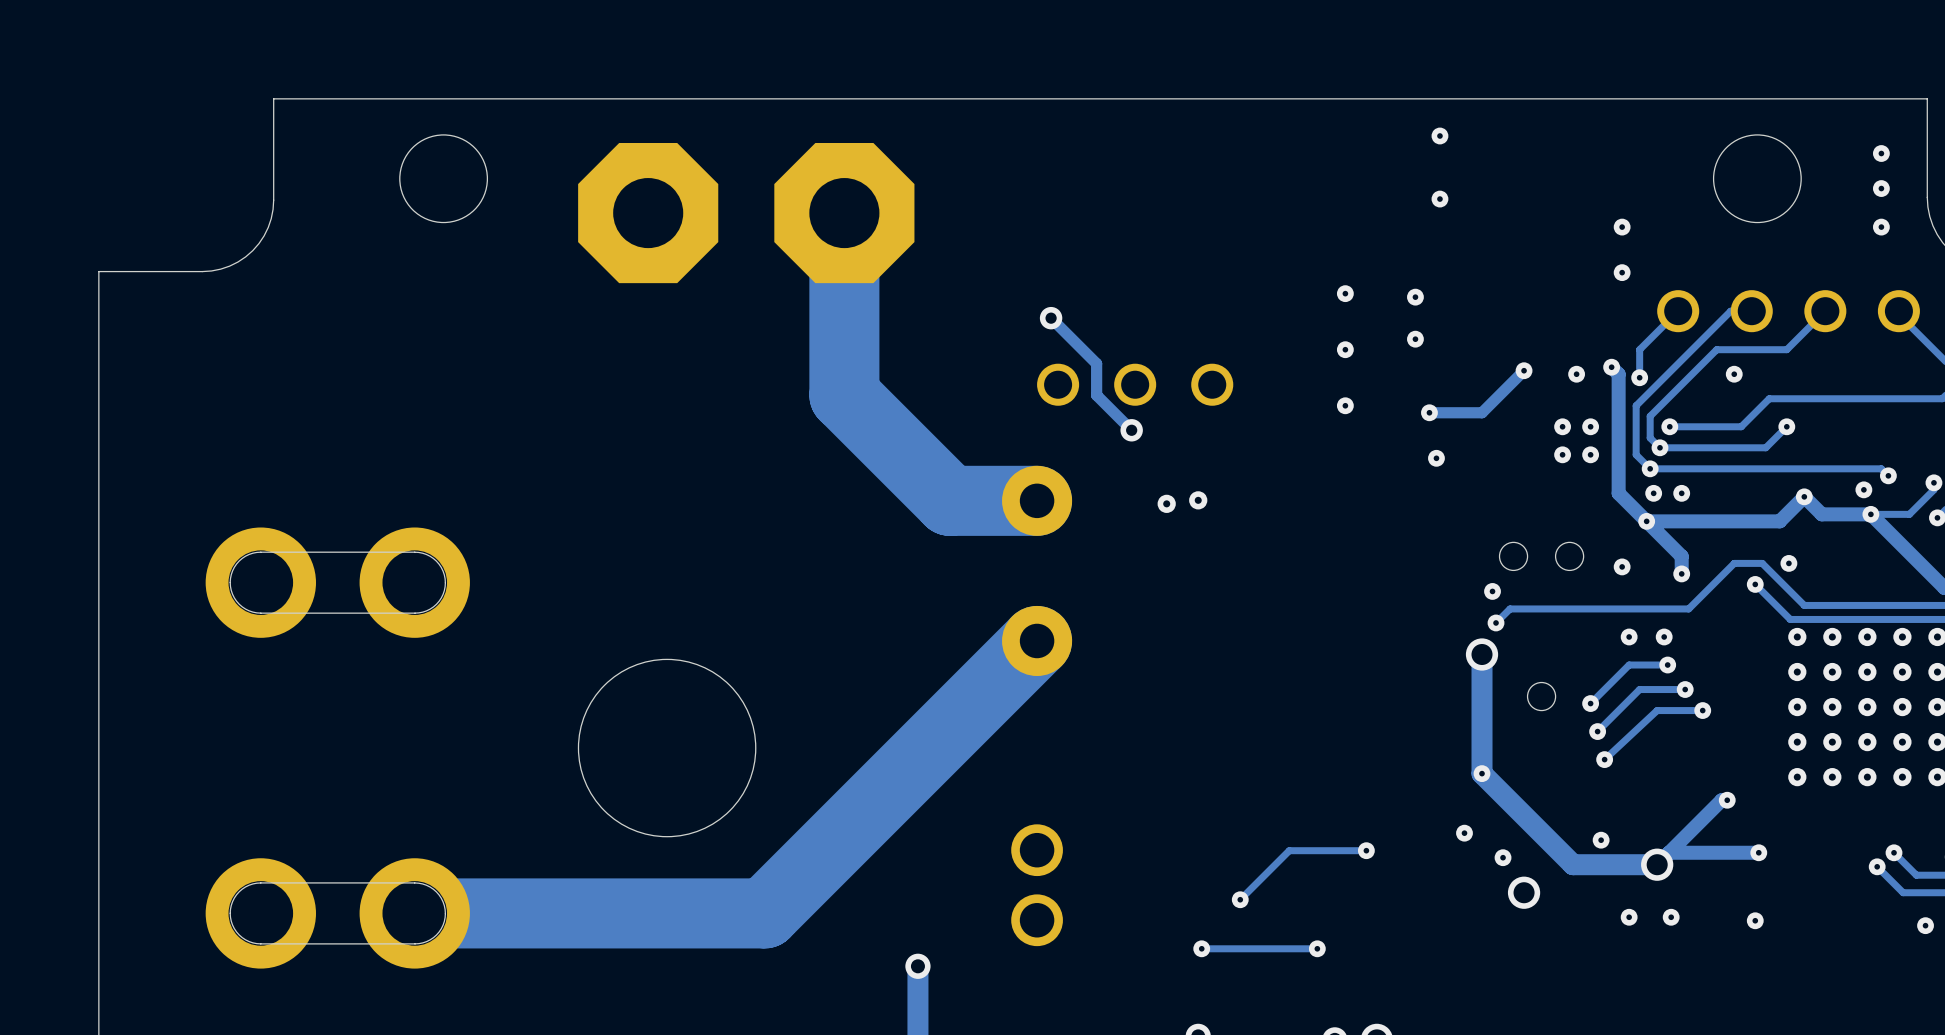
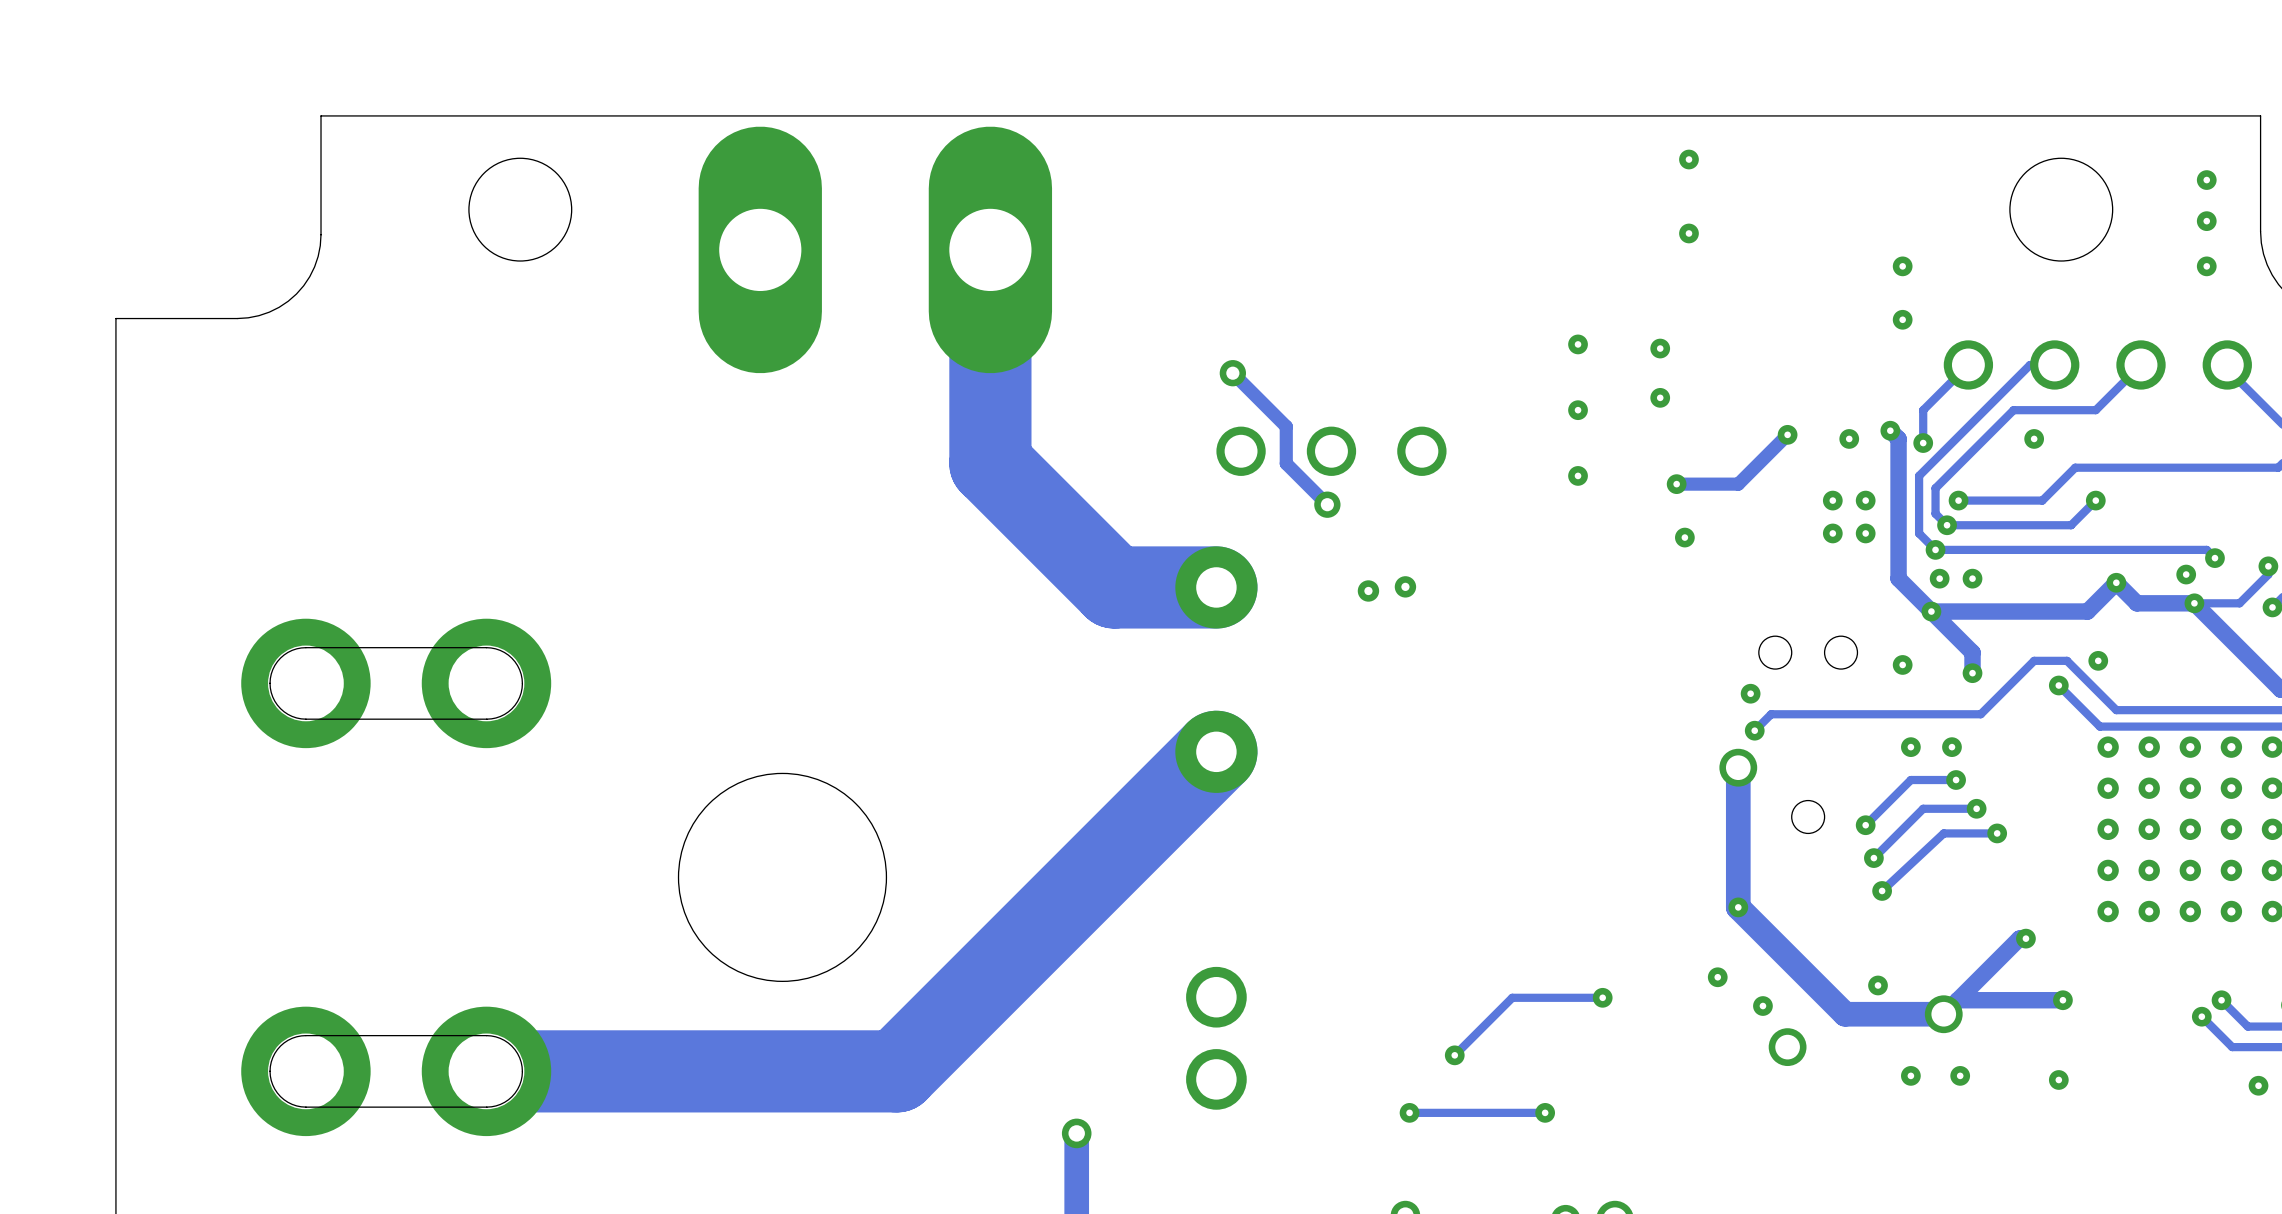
part footprint: [578, 143, 719, 284] -> [698, 126, 822, 374]
part footprint: [774, 143, 915, 284] -> [928, 126, 1053, 374]

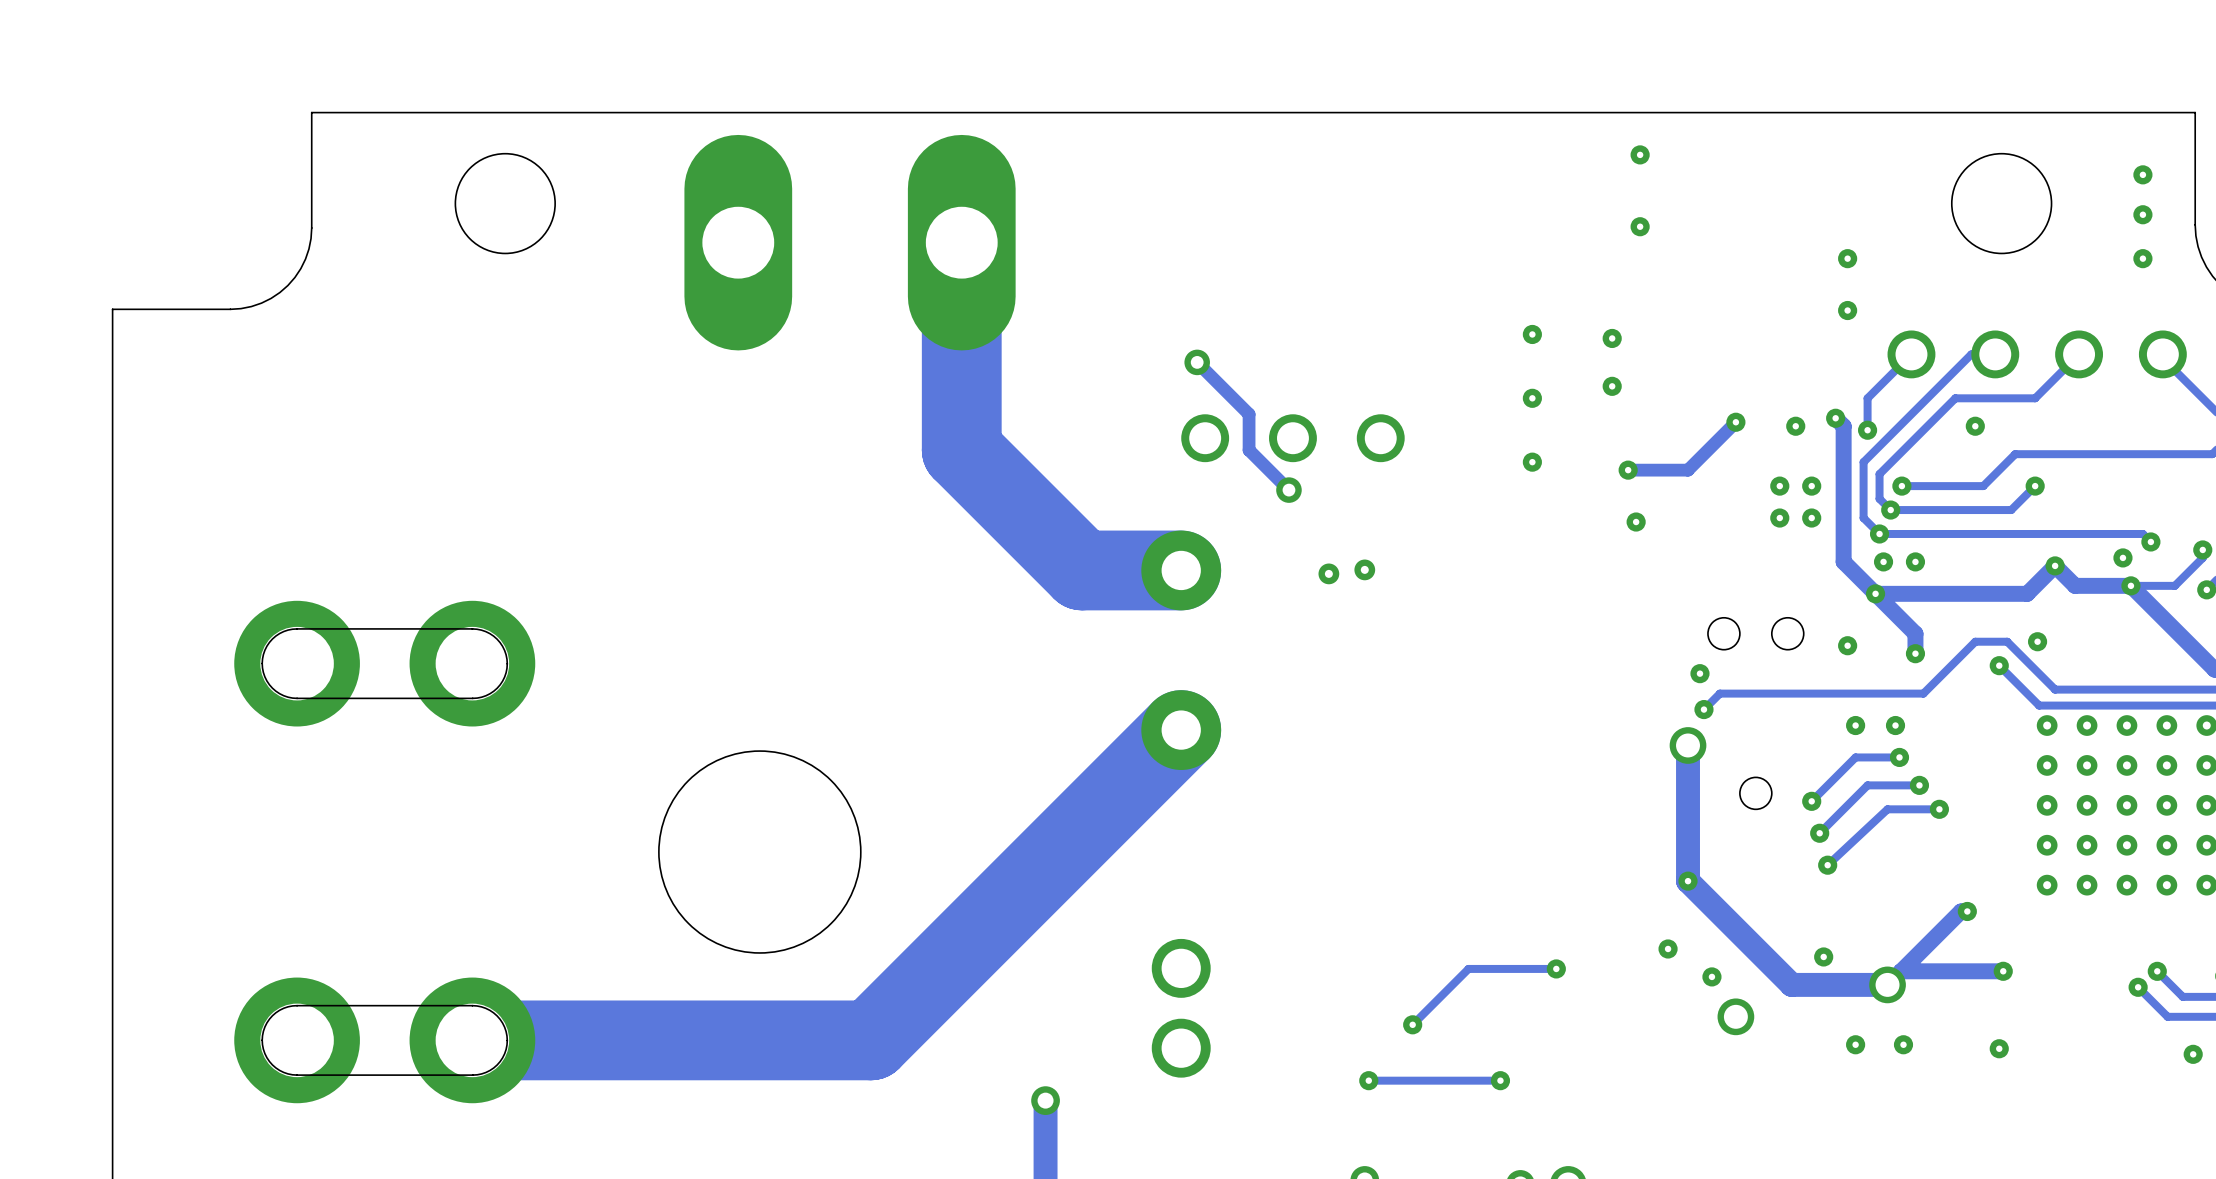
part footprint: [698, 126, 822, 374] -> [684, 134, 793, 351]
part footprint: [928, 126, 1053, 374] -> [907, 134, 1016, 351]

